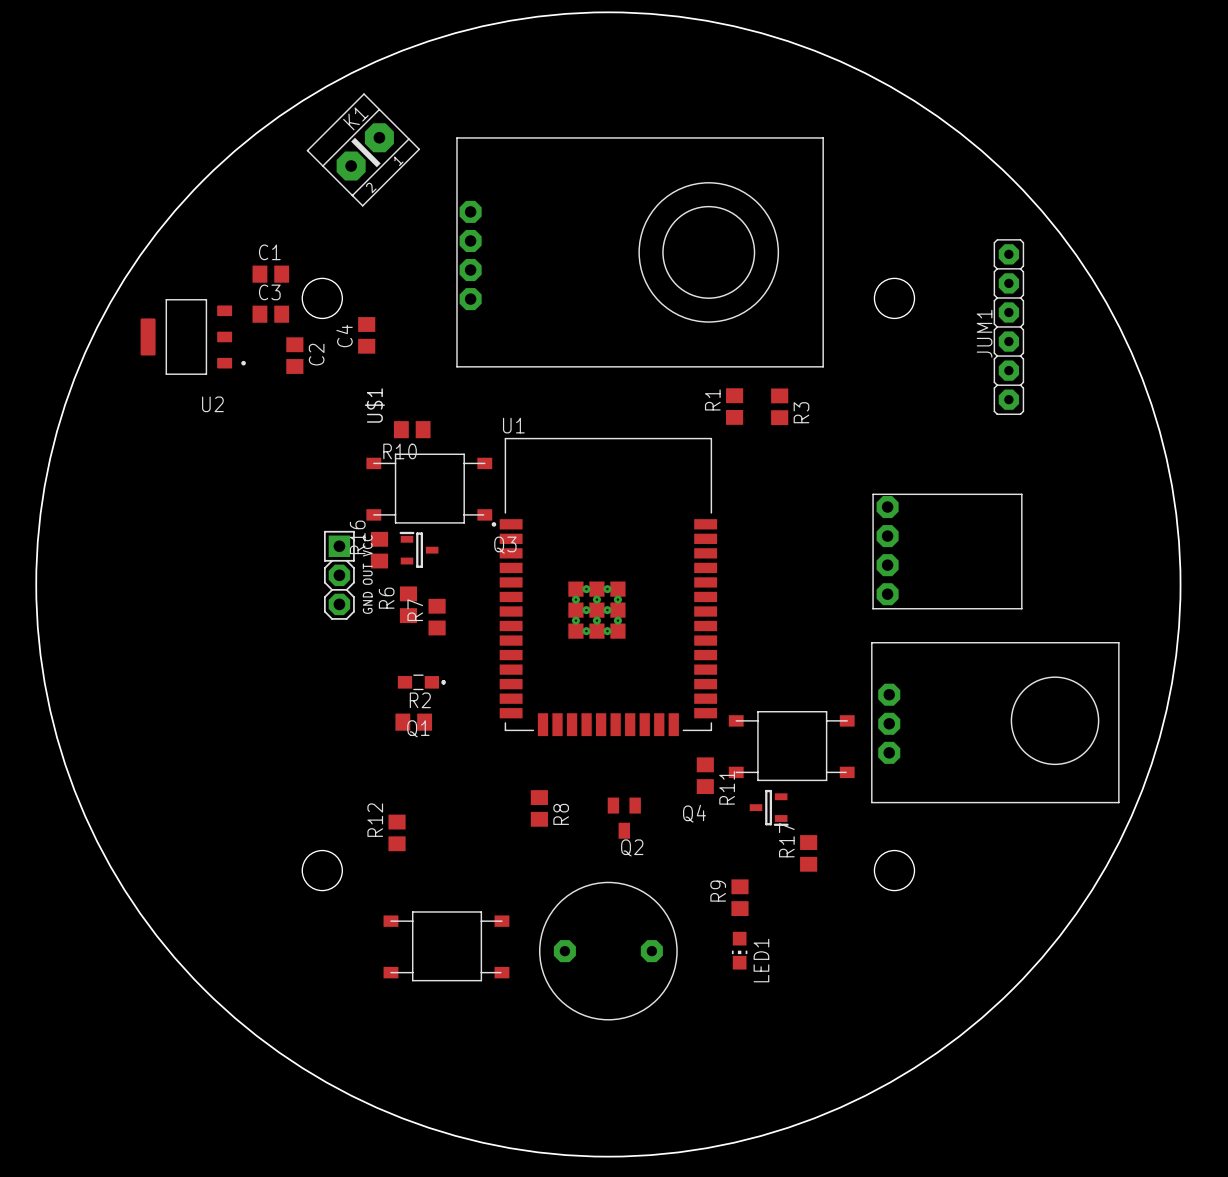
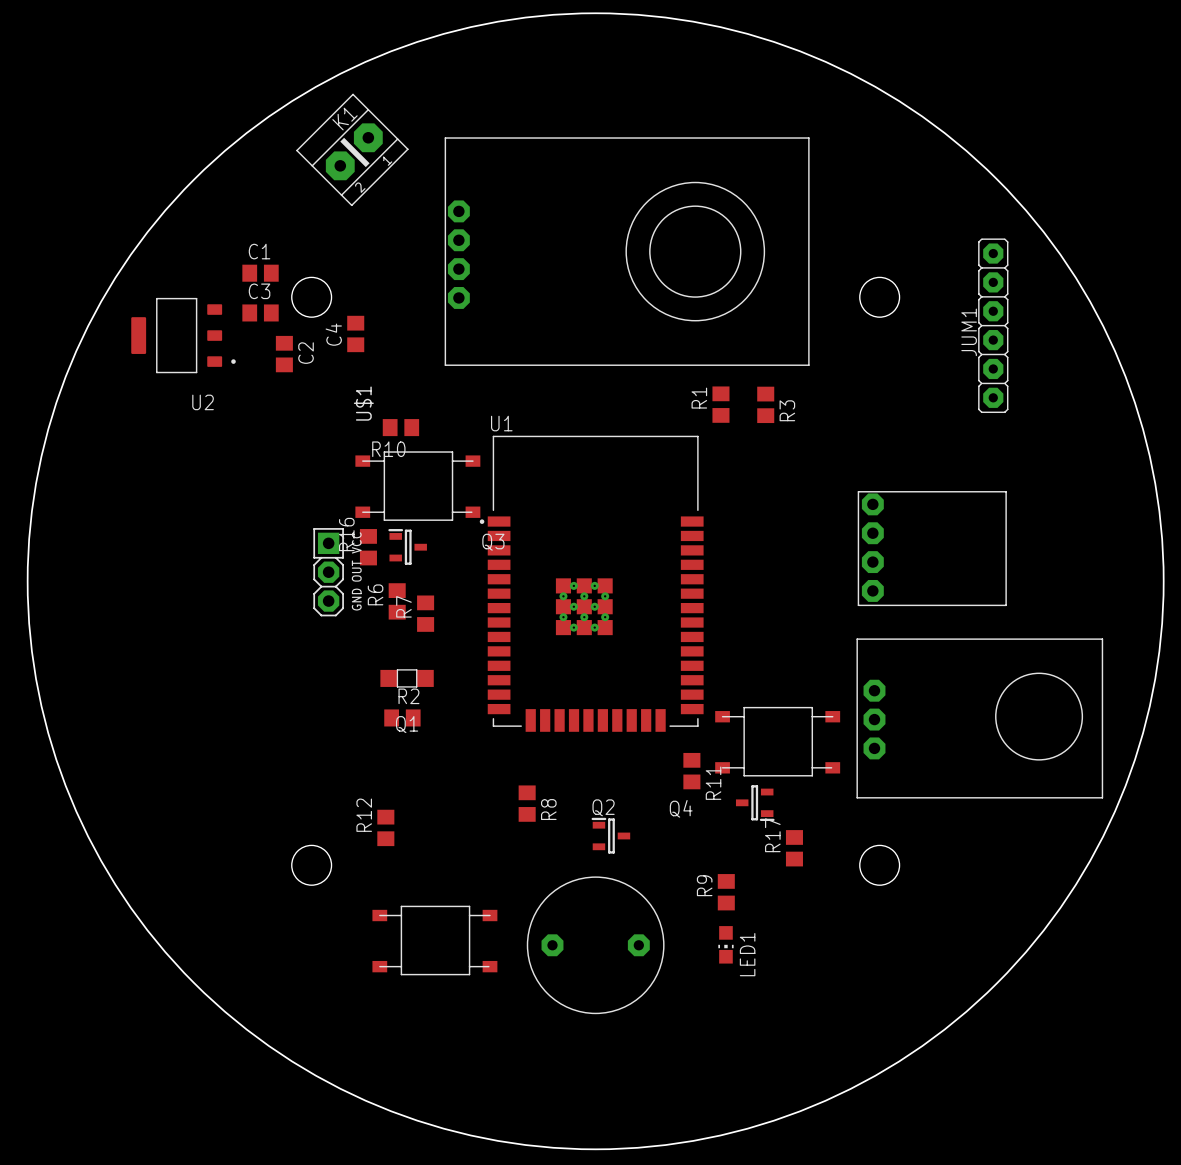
Q1 footprint: [397, 674, 446, 691] -> [380, 669, 434, 688]
Q2 footprint: [607, 797, 641, 839] -> [591, 817, 631, 854]
Q2 name position: Q2 (632, 847) -> Q2 (603, 807)

